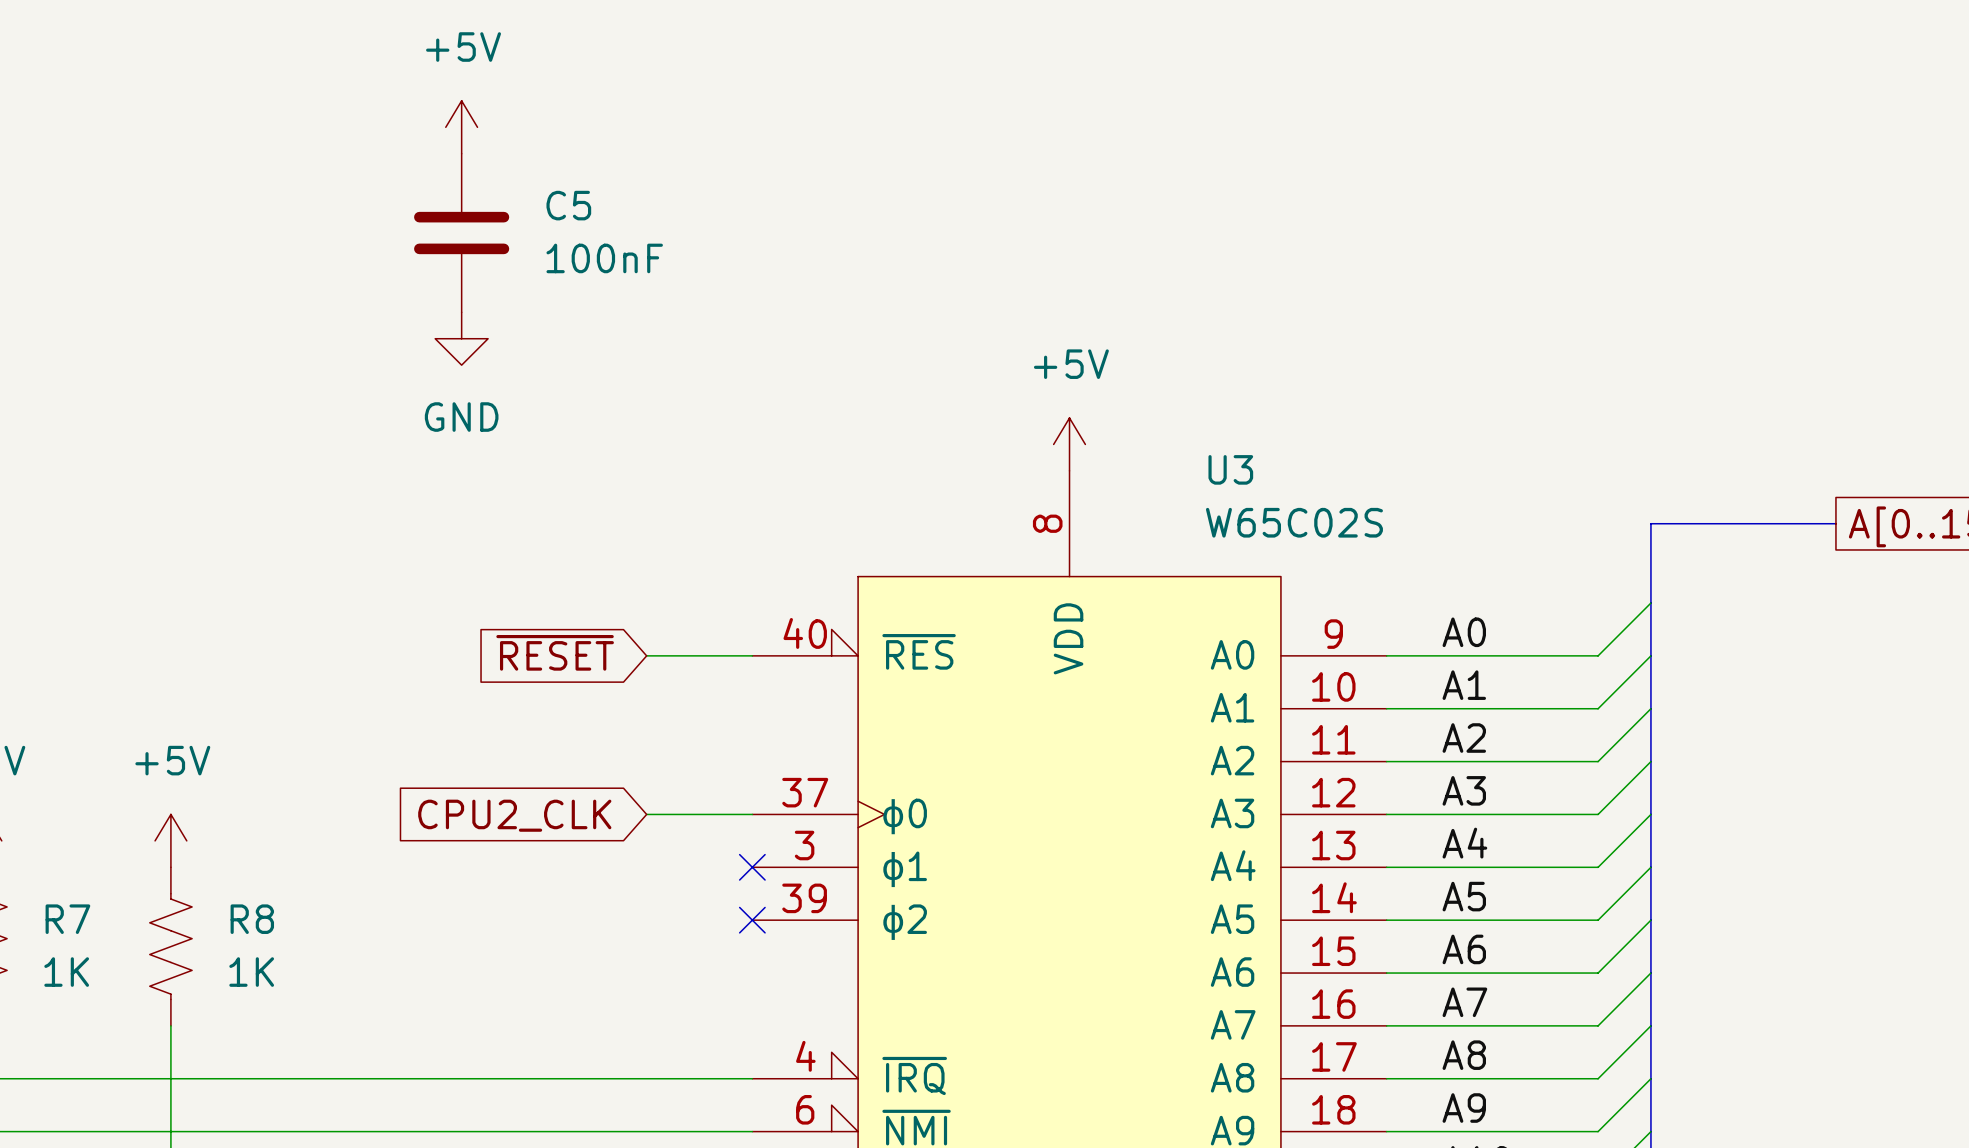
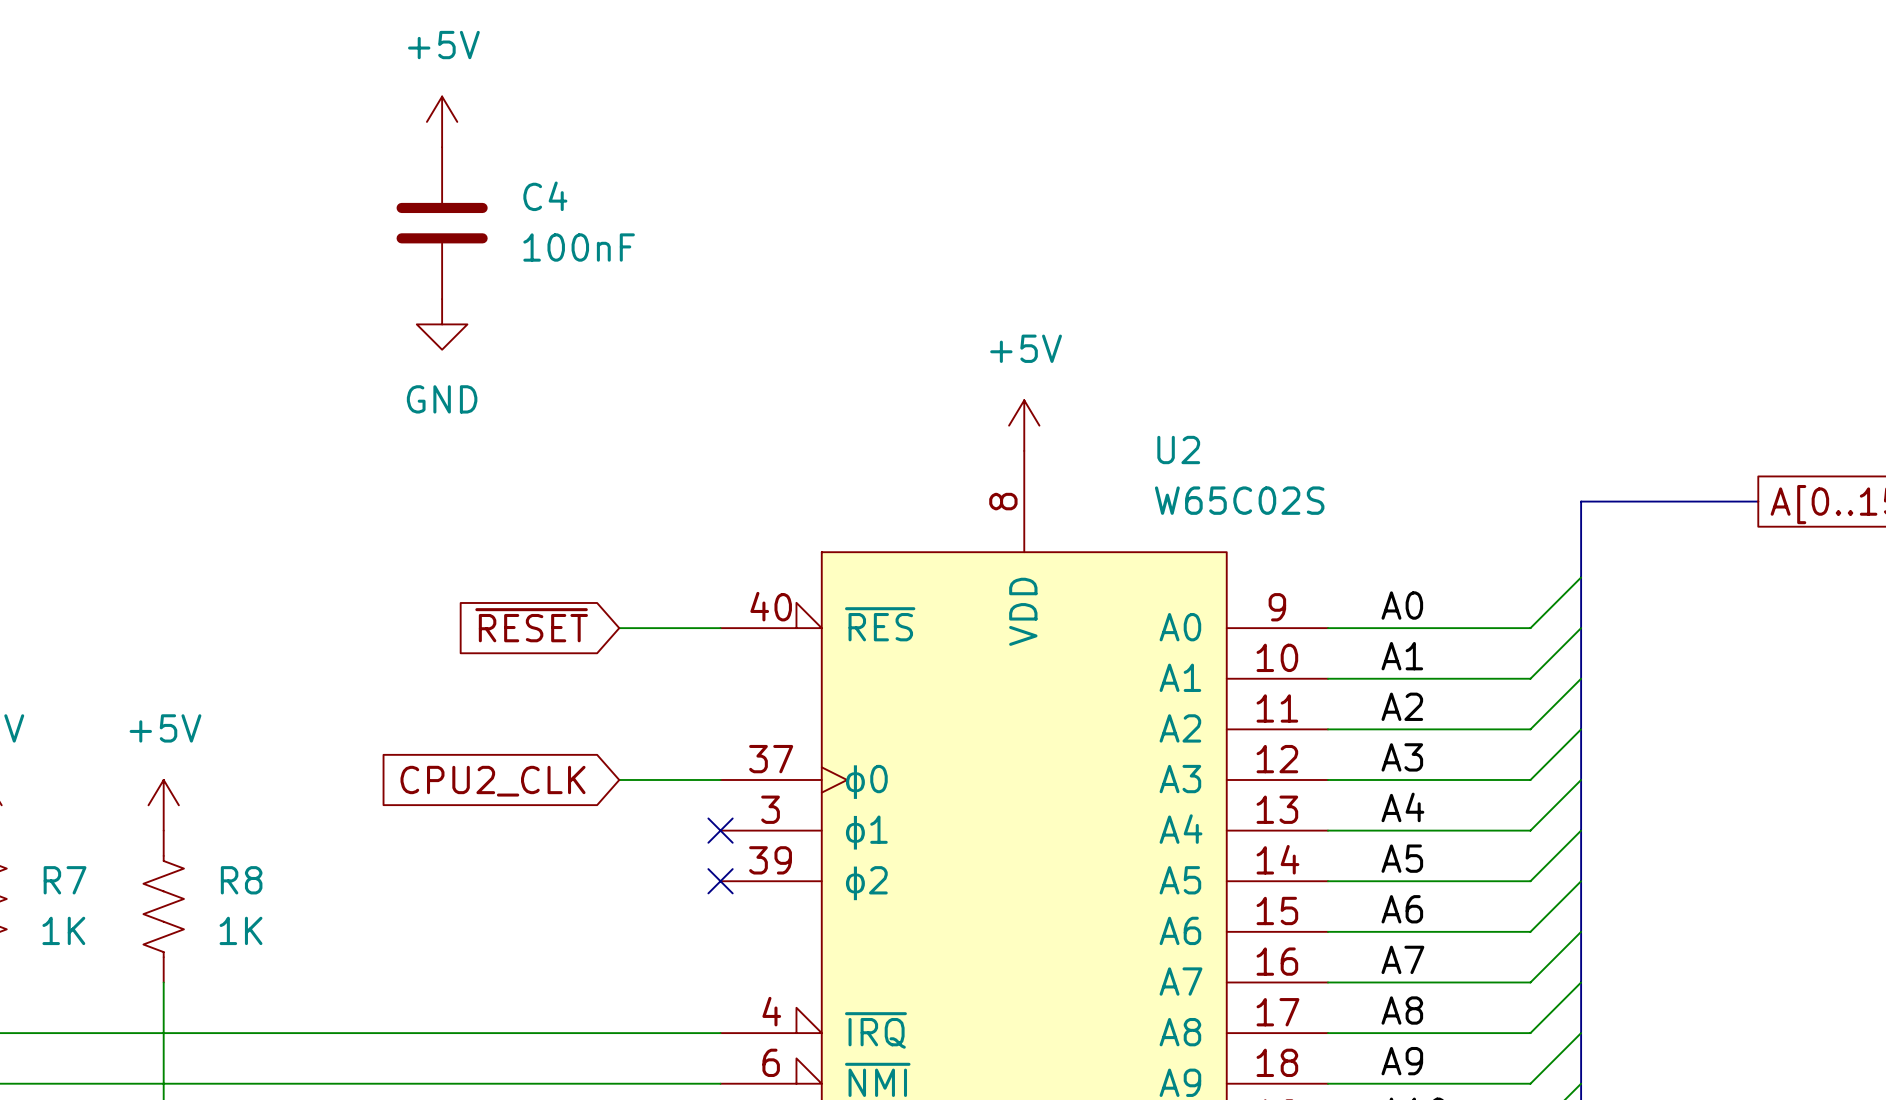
C5 name: C5 (568, 205) -> C4 (545, 196)
U3 name: U3 (1230, 469) -> U2 (1178, 450)

